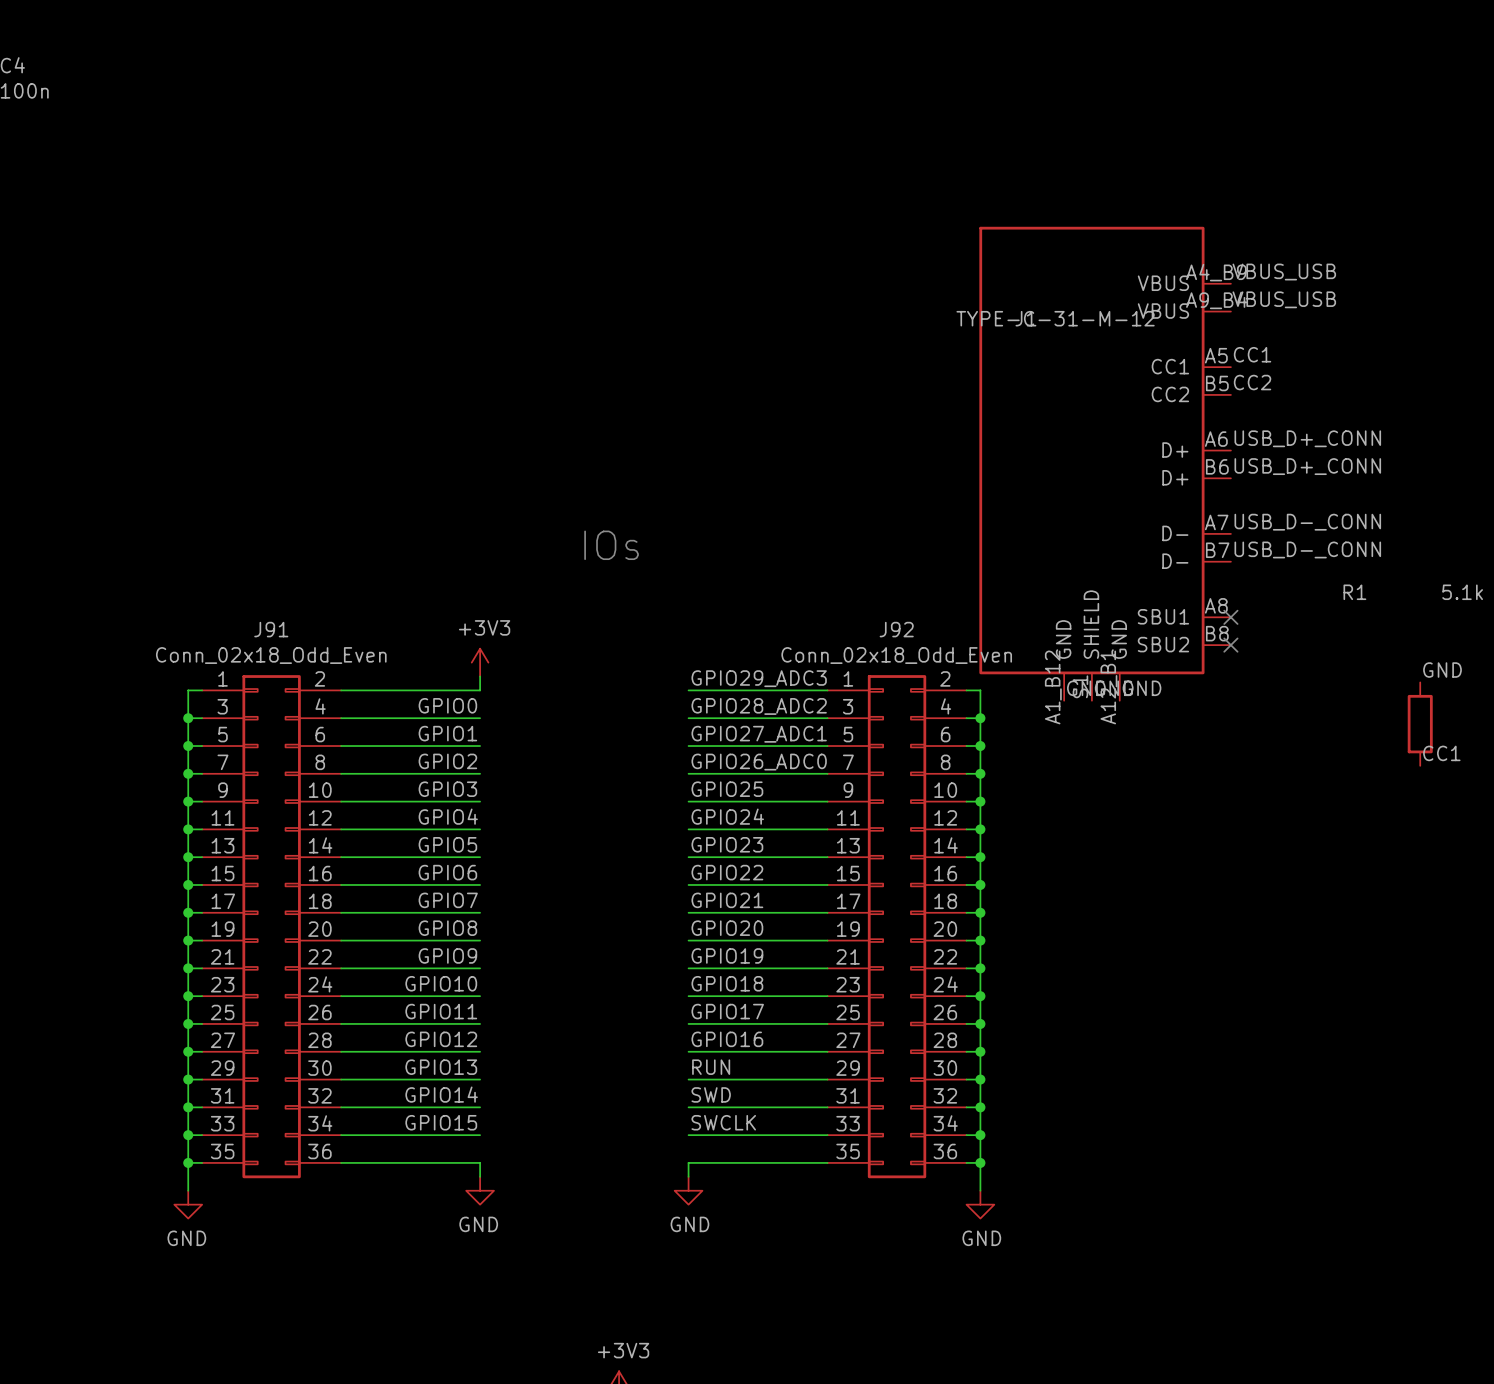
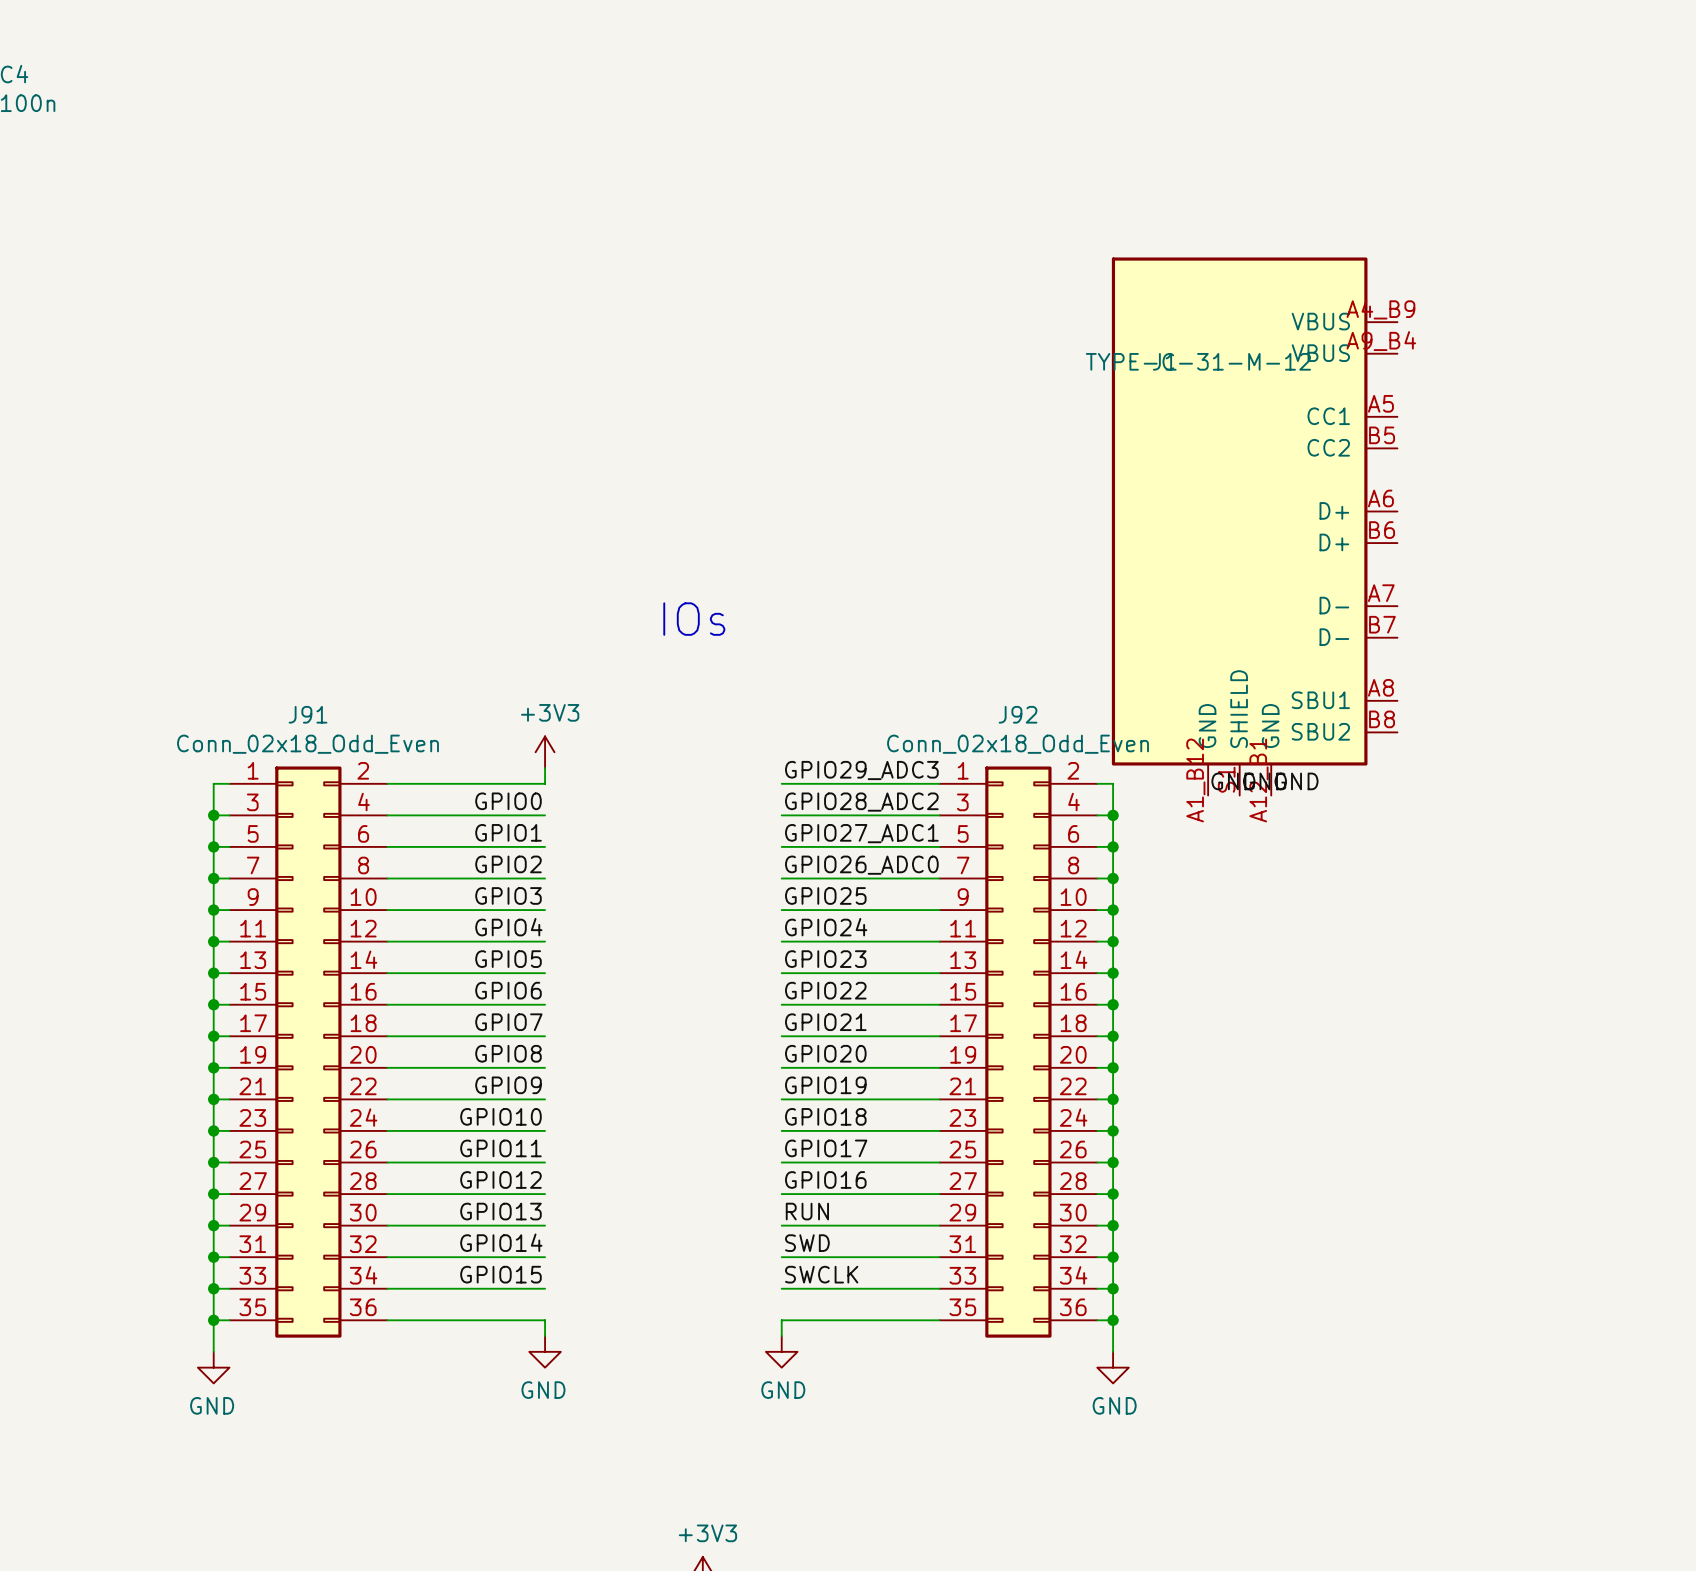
label: VBUS_USB (1284, 272) -> none
label: VBUS_USB (1284, 299) -> none
label: CC1 (1252, 354) -> none
label: CC2 (1252, 382) -> none
label: USB_D+_CONN (1307, 438) -> none
label: USB_D+_CONN (1307, 466) -> none
label: USB_D-_CONN (1307, 522) -> none
label: USB_D-_CONN (1307, 549) -> none
no-connect mark: (1230, 617) -> none
no-connect mark: (1230, 645) -> none
label: GND (1442, 670) -> none
R1: 5.1k (1420, 724) -> none
label: CC1 (1441, 753) -> none

